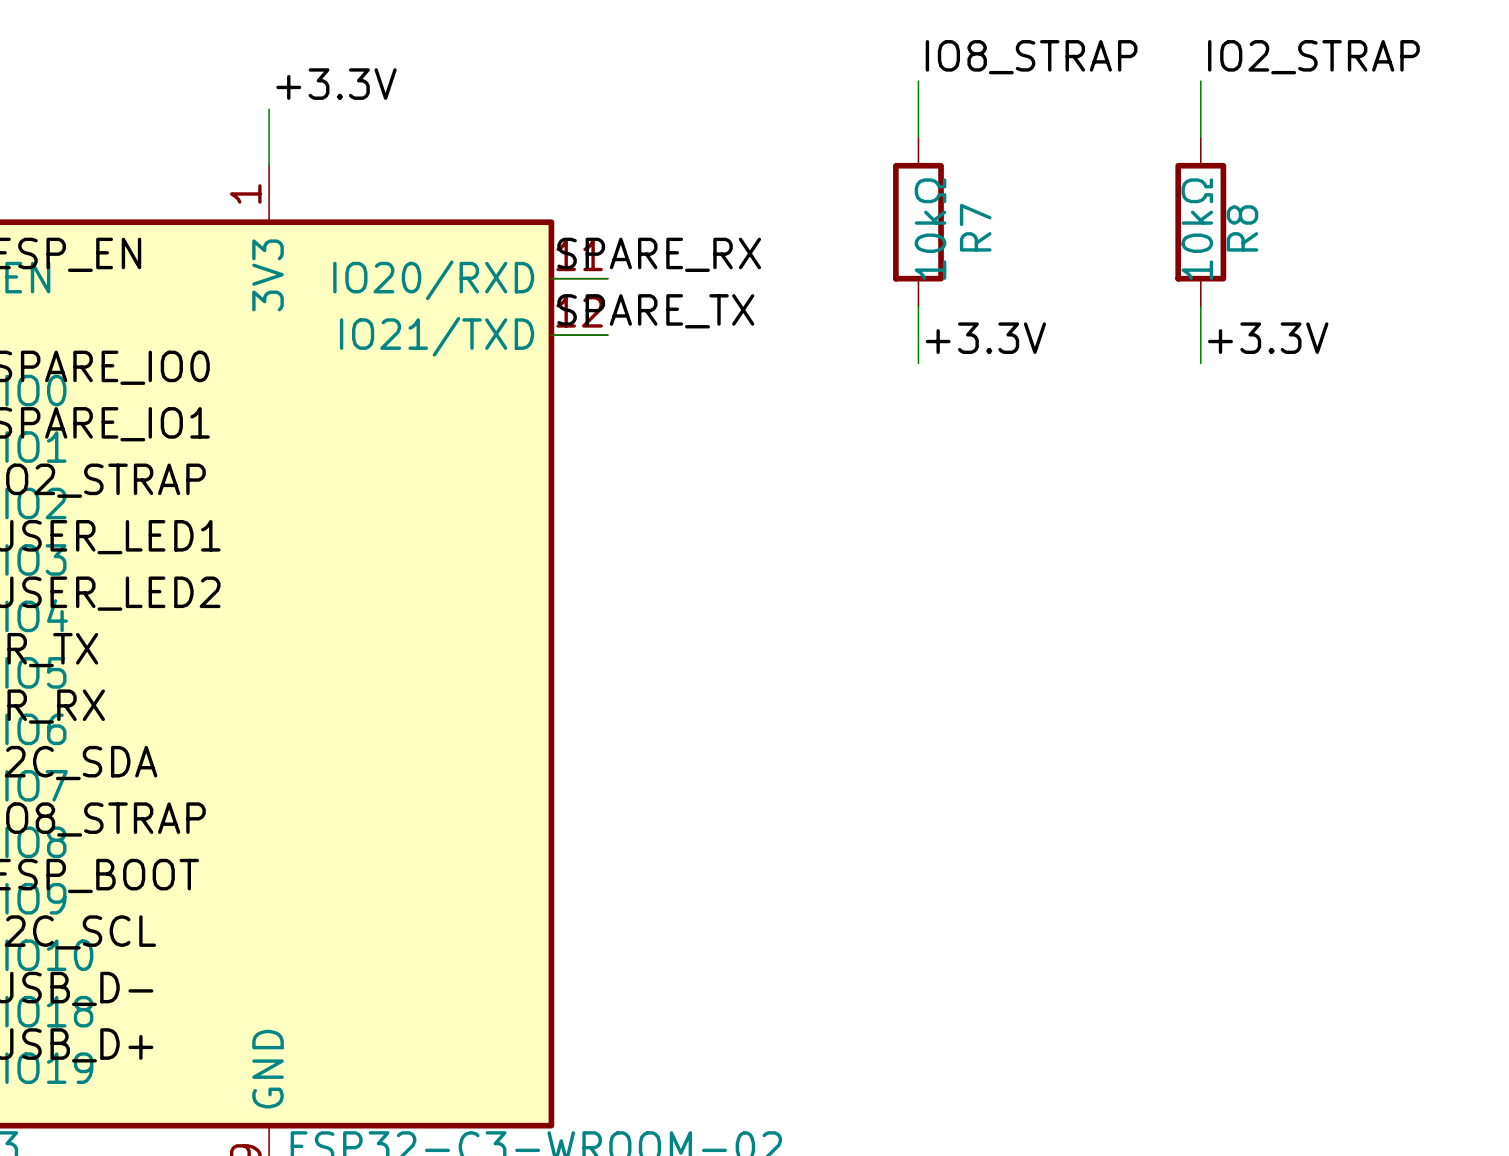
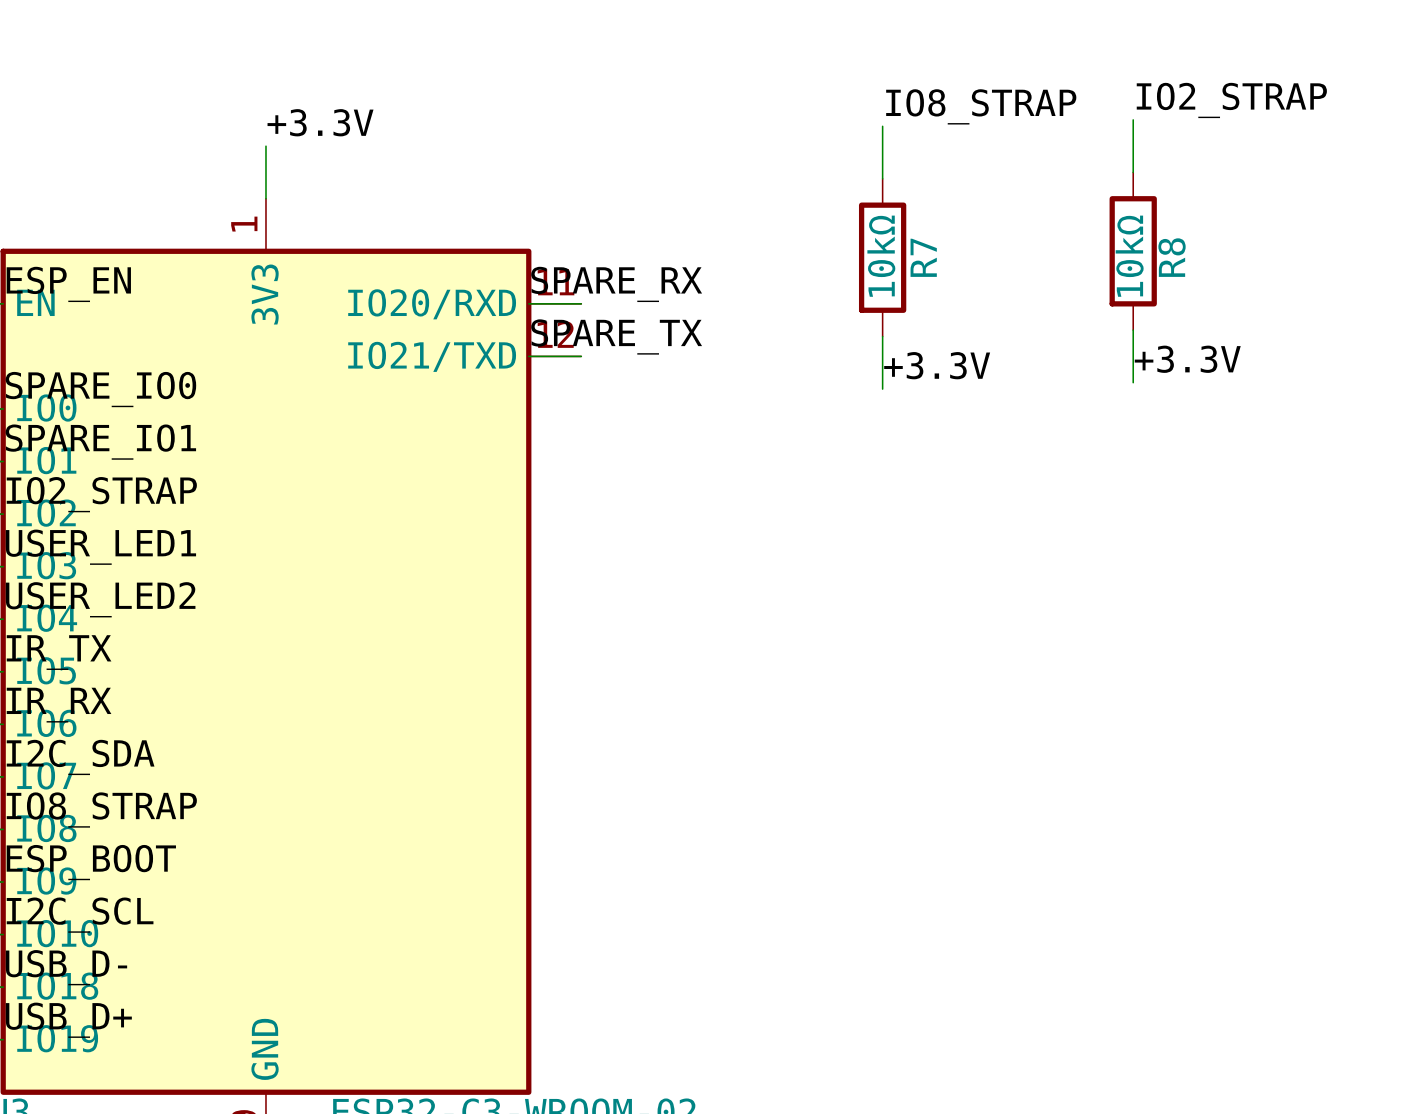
label position: IO8_STRAP (1031, 57) -> IO8_STRAP (981, 106)
wire: (918, 81) (918, 137) -> (882, 126) (882, 178)
R7 position: (918, 222) -> (882, 257)
wire: (918, 306) (918, 363) -> (882, 336) (882, 389)
label position: +3.3V (985, 338) -> +3.3V (937, 365)

